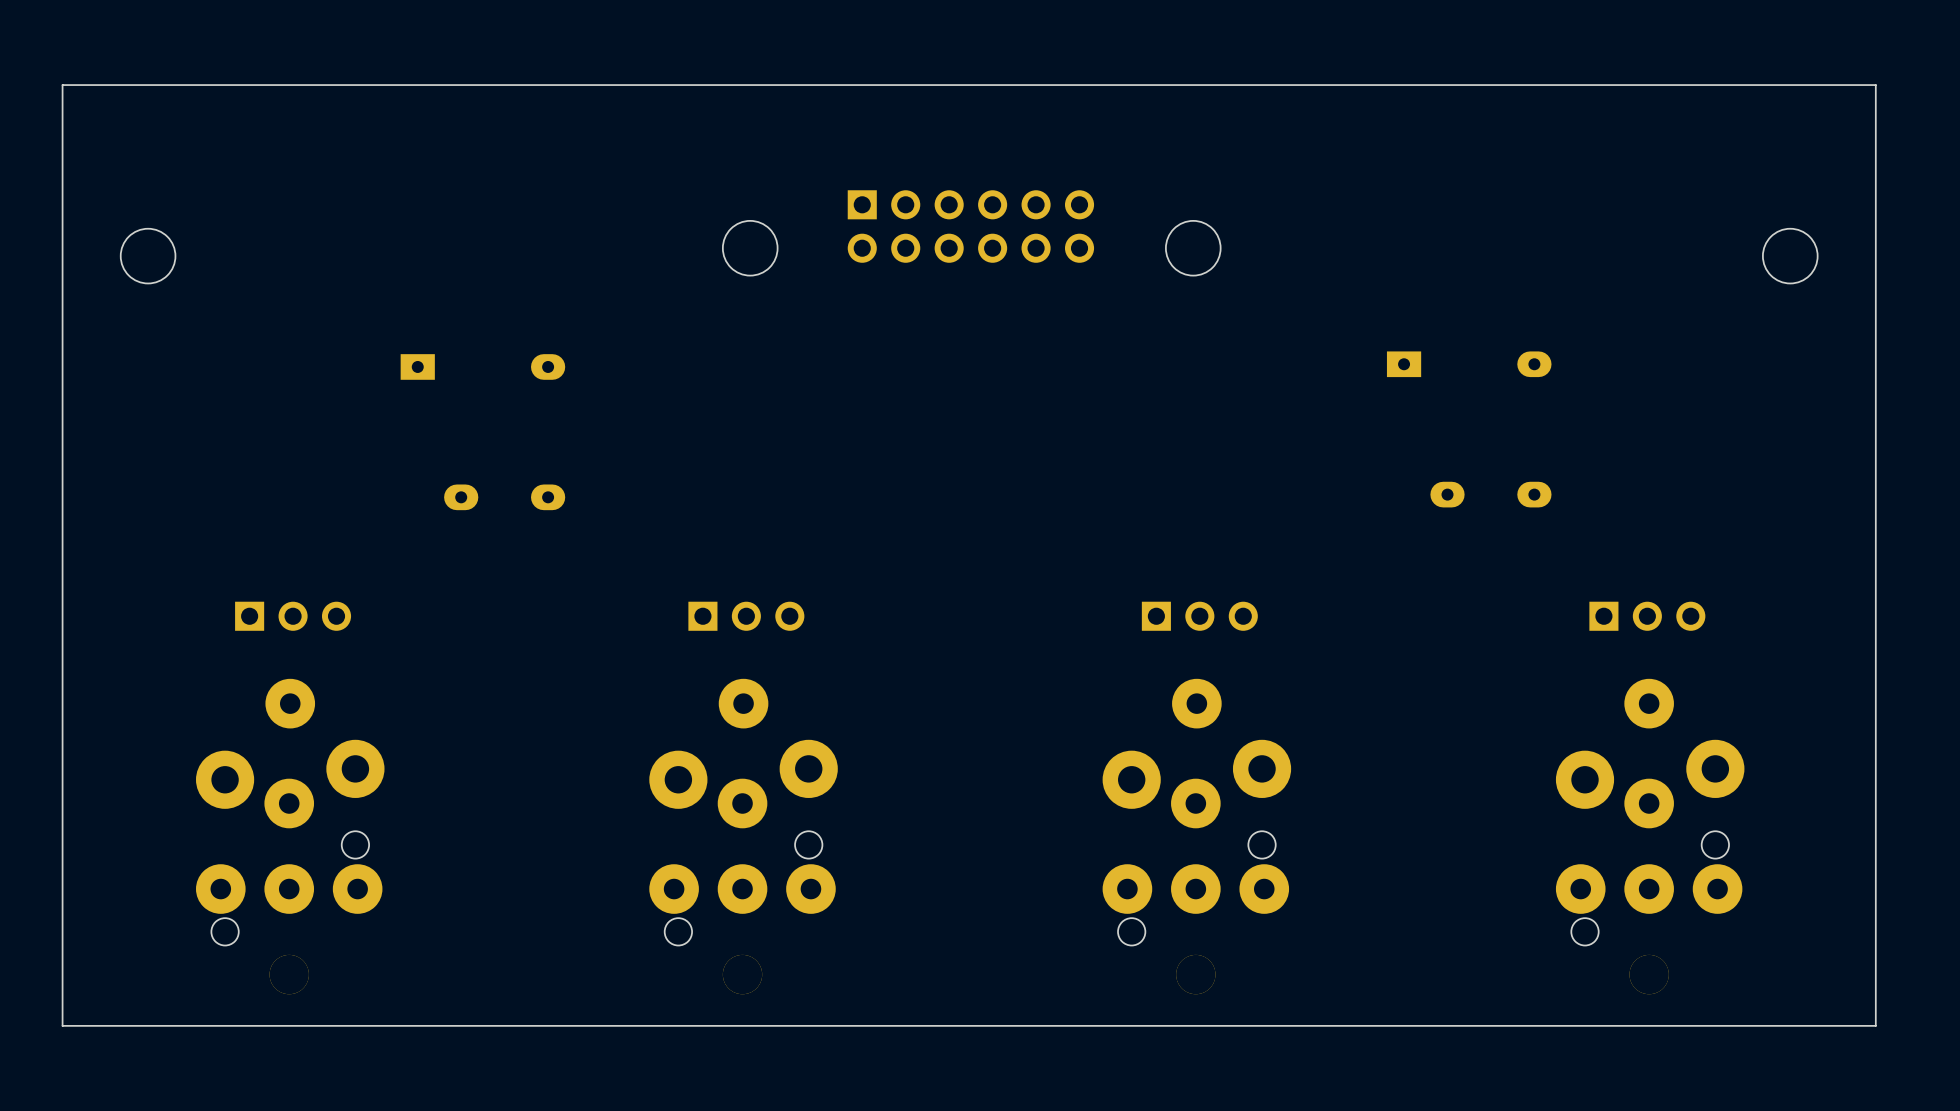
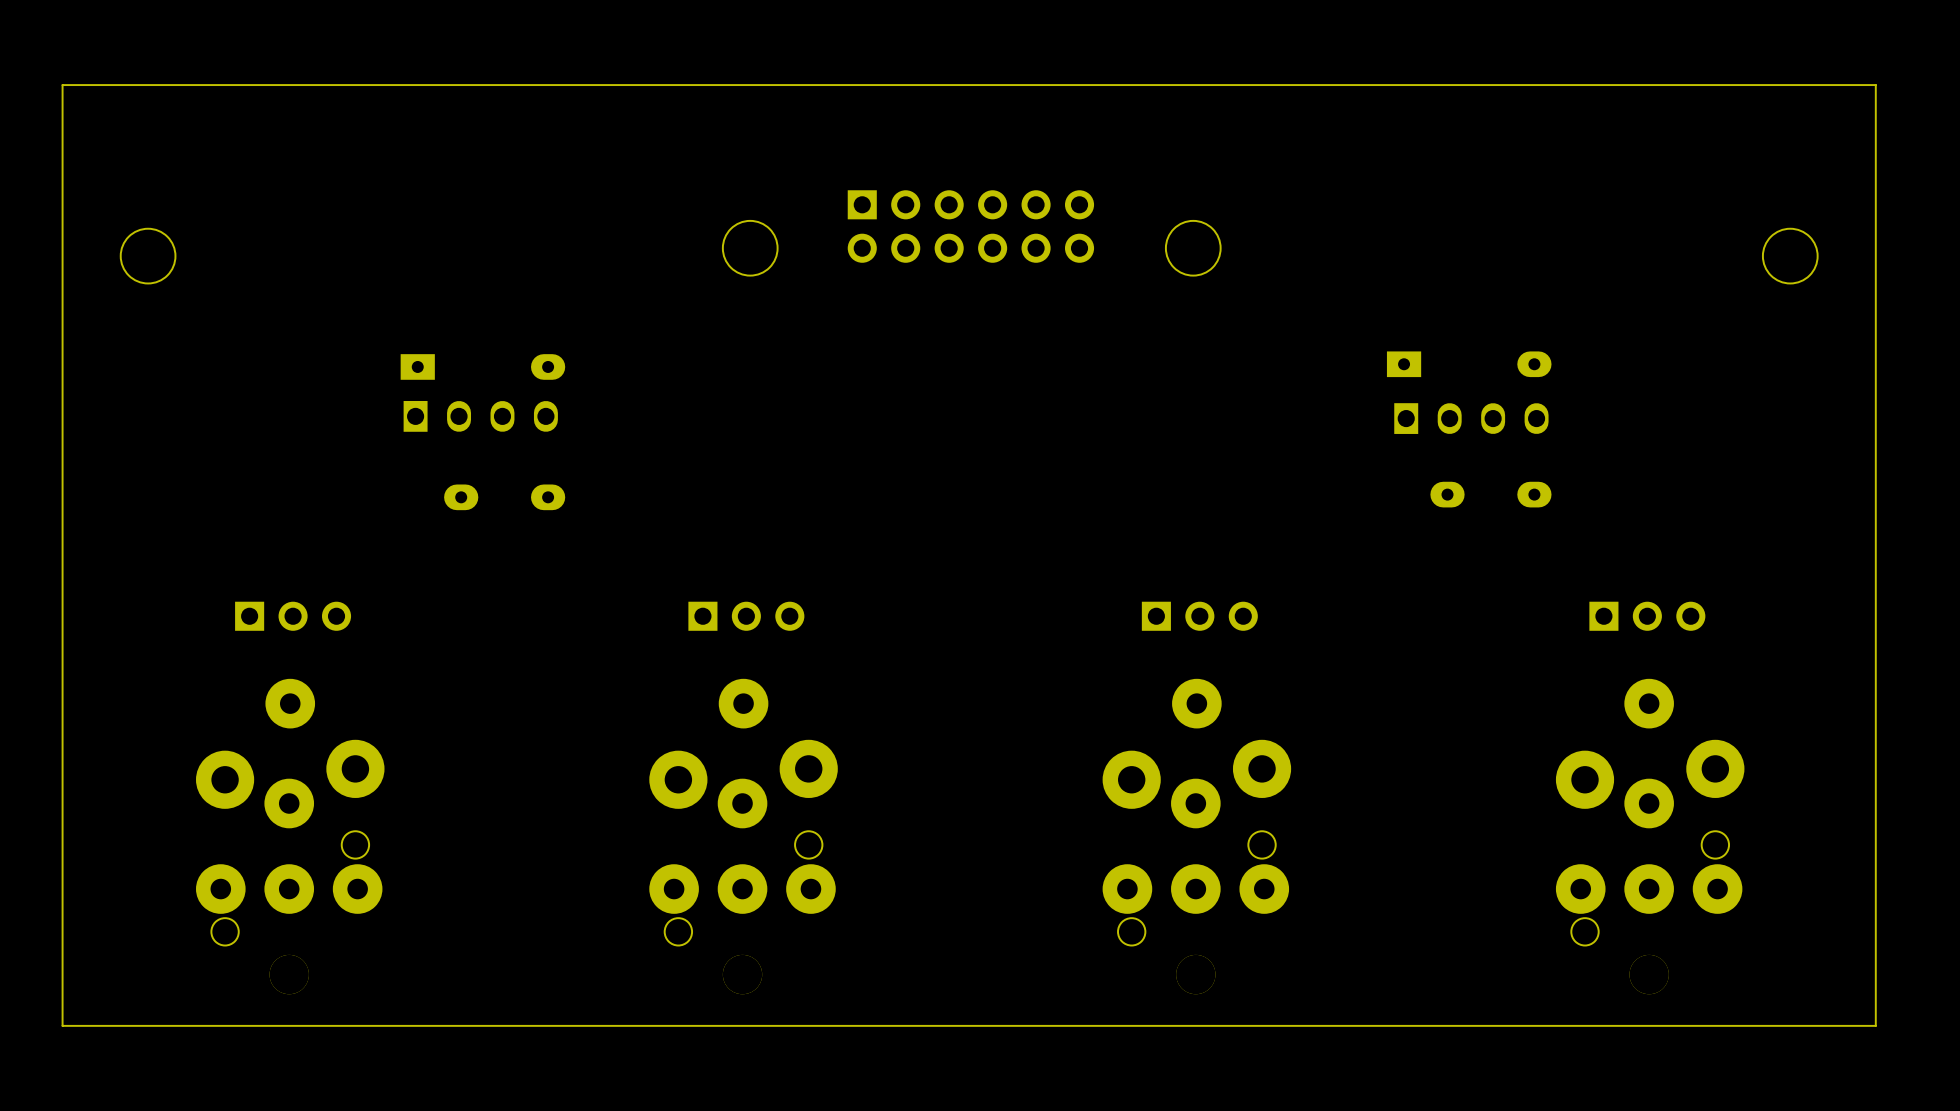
part: none -> (480, 416)
part: none -> (1471, 418)

